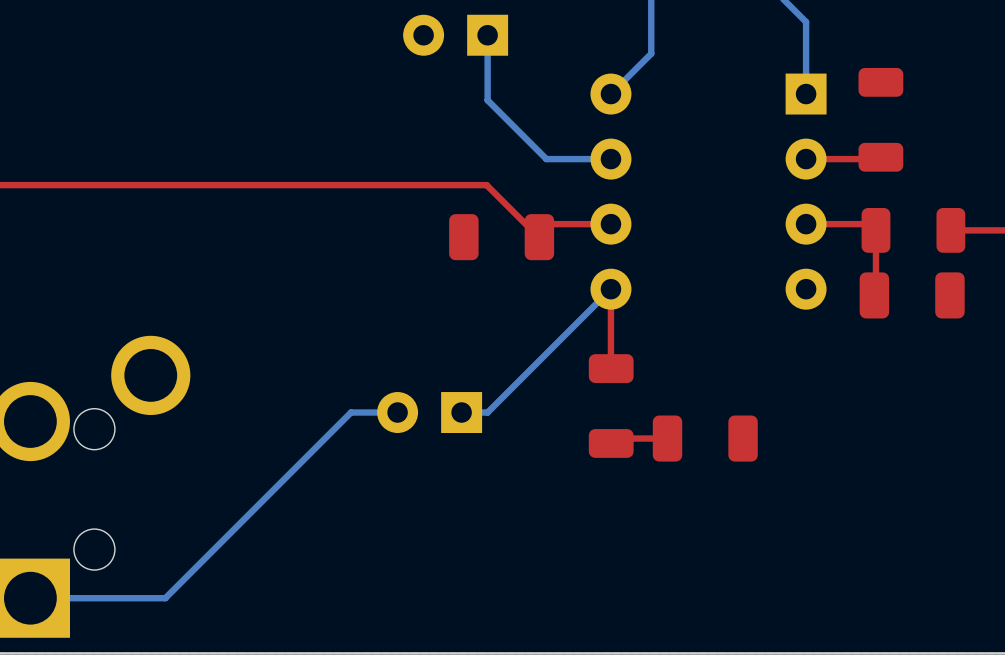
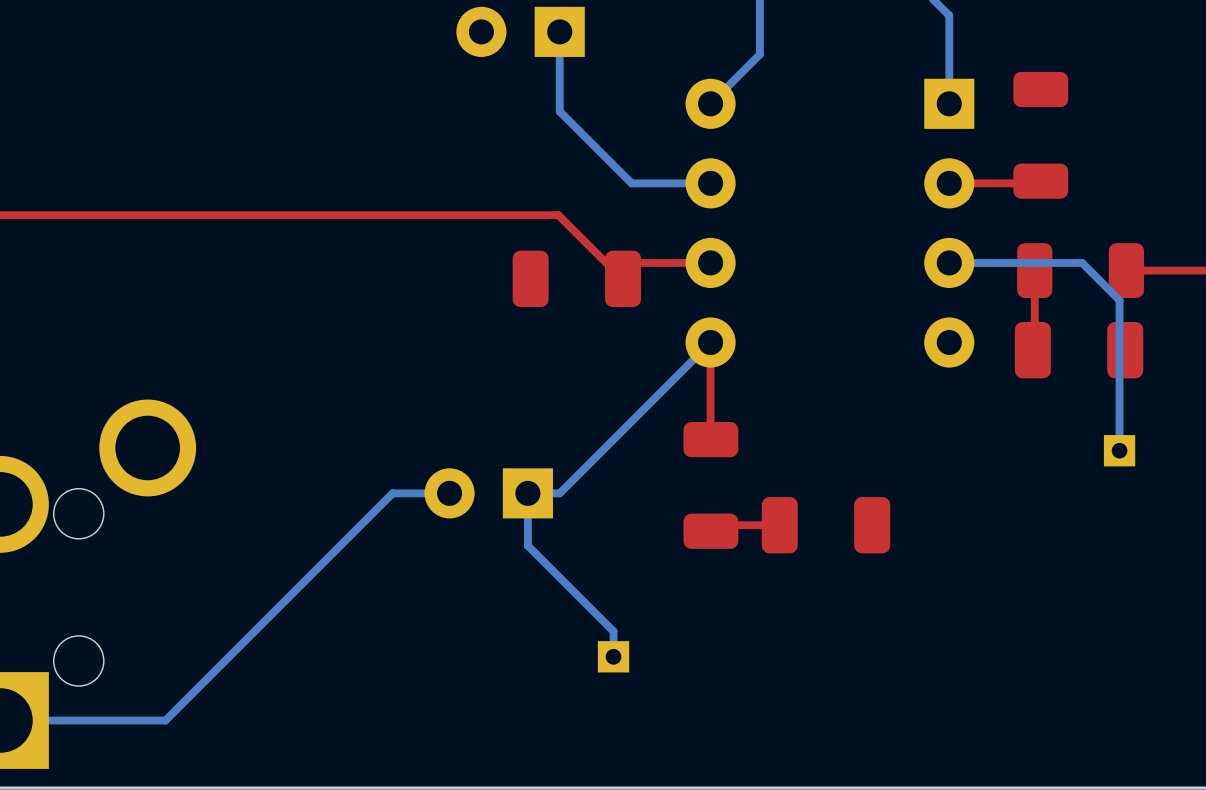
bottom track: none -> (949, 262) (1082, 262) (1119, 300) (1119, 450)
part: none -> (1119, 450)
bottom track: none -> (527, 493) (527, 545) (613, 631) (613, 656)
part: none -> (613, 656)

